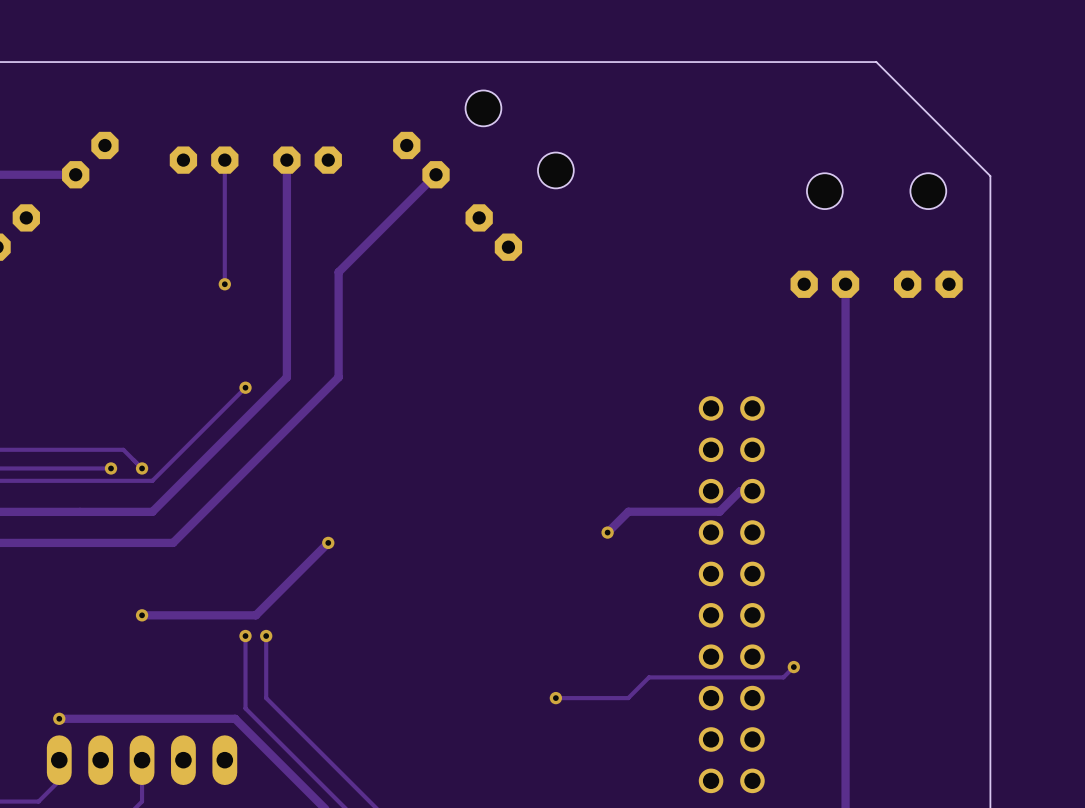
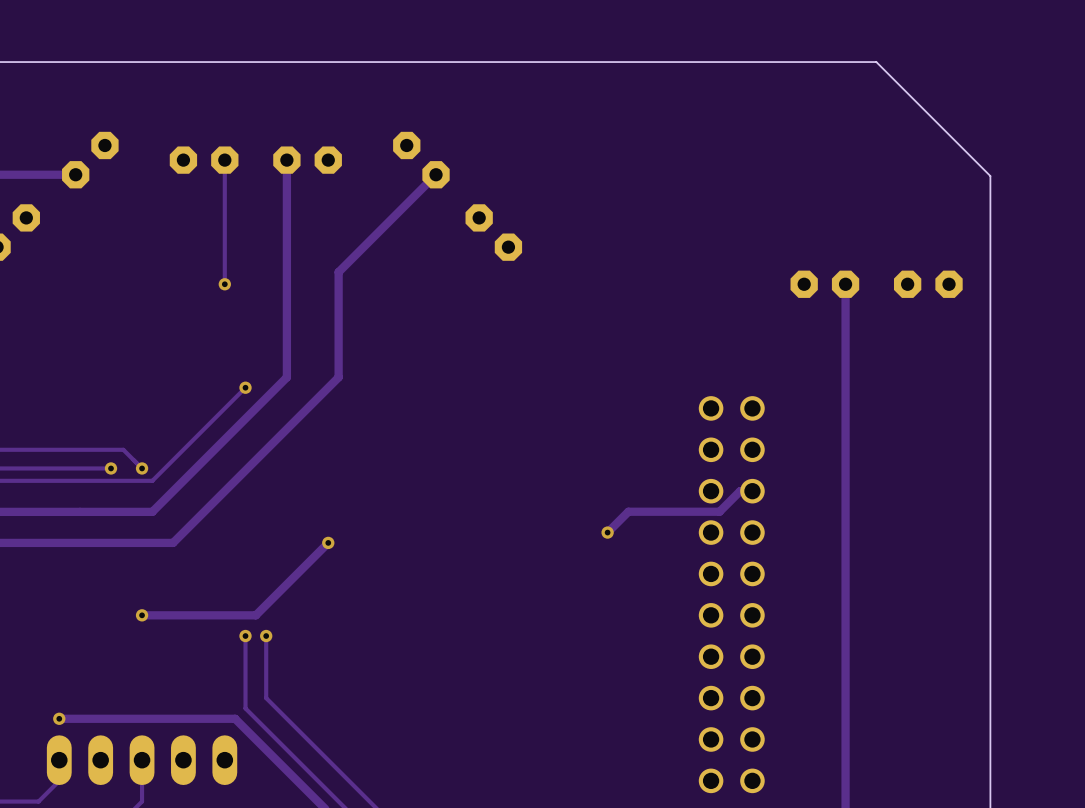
hole: (483, 108) -> none
hole: (555, 170) -> none
hole: (824, 191) -> none
hole: (928, 191) -> none
track: (793, 667) (783, 677) (648, 677) (628, 698) (555, 698) -> none
via: (793, 667) -> none
via: (555, 698) -> none

